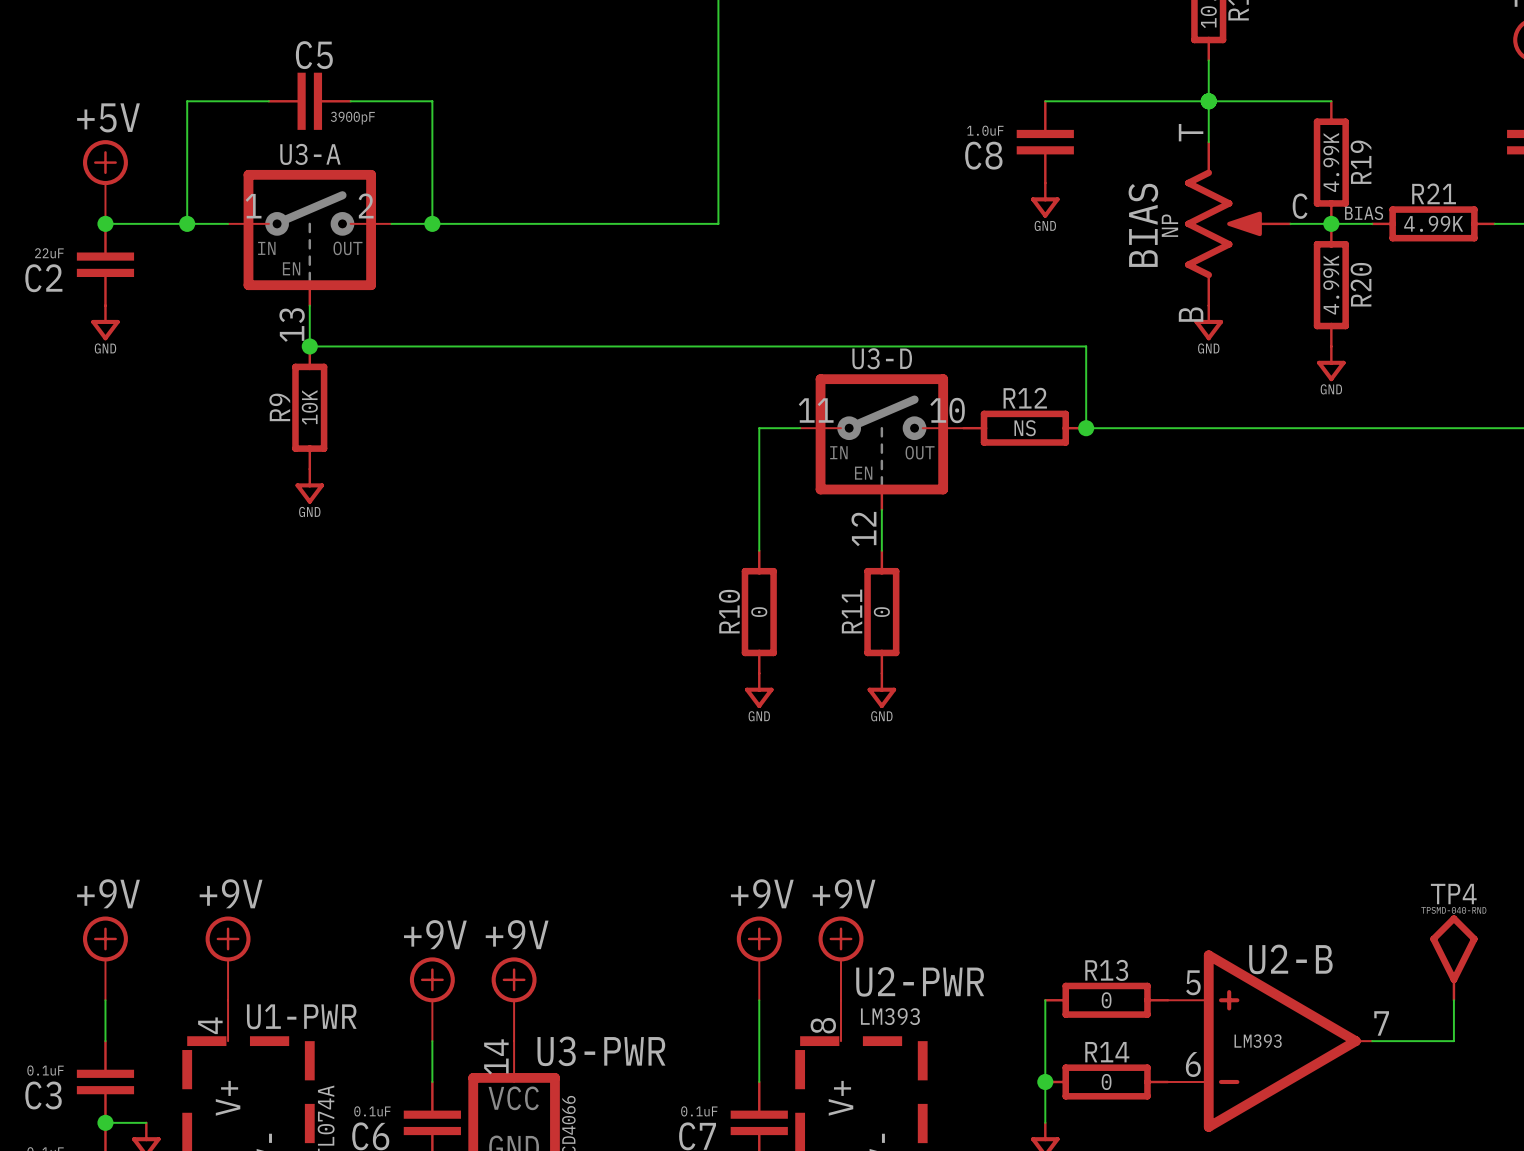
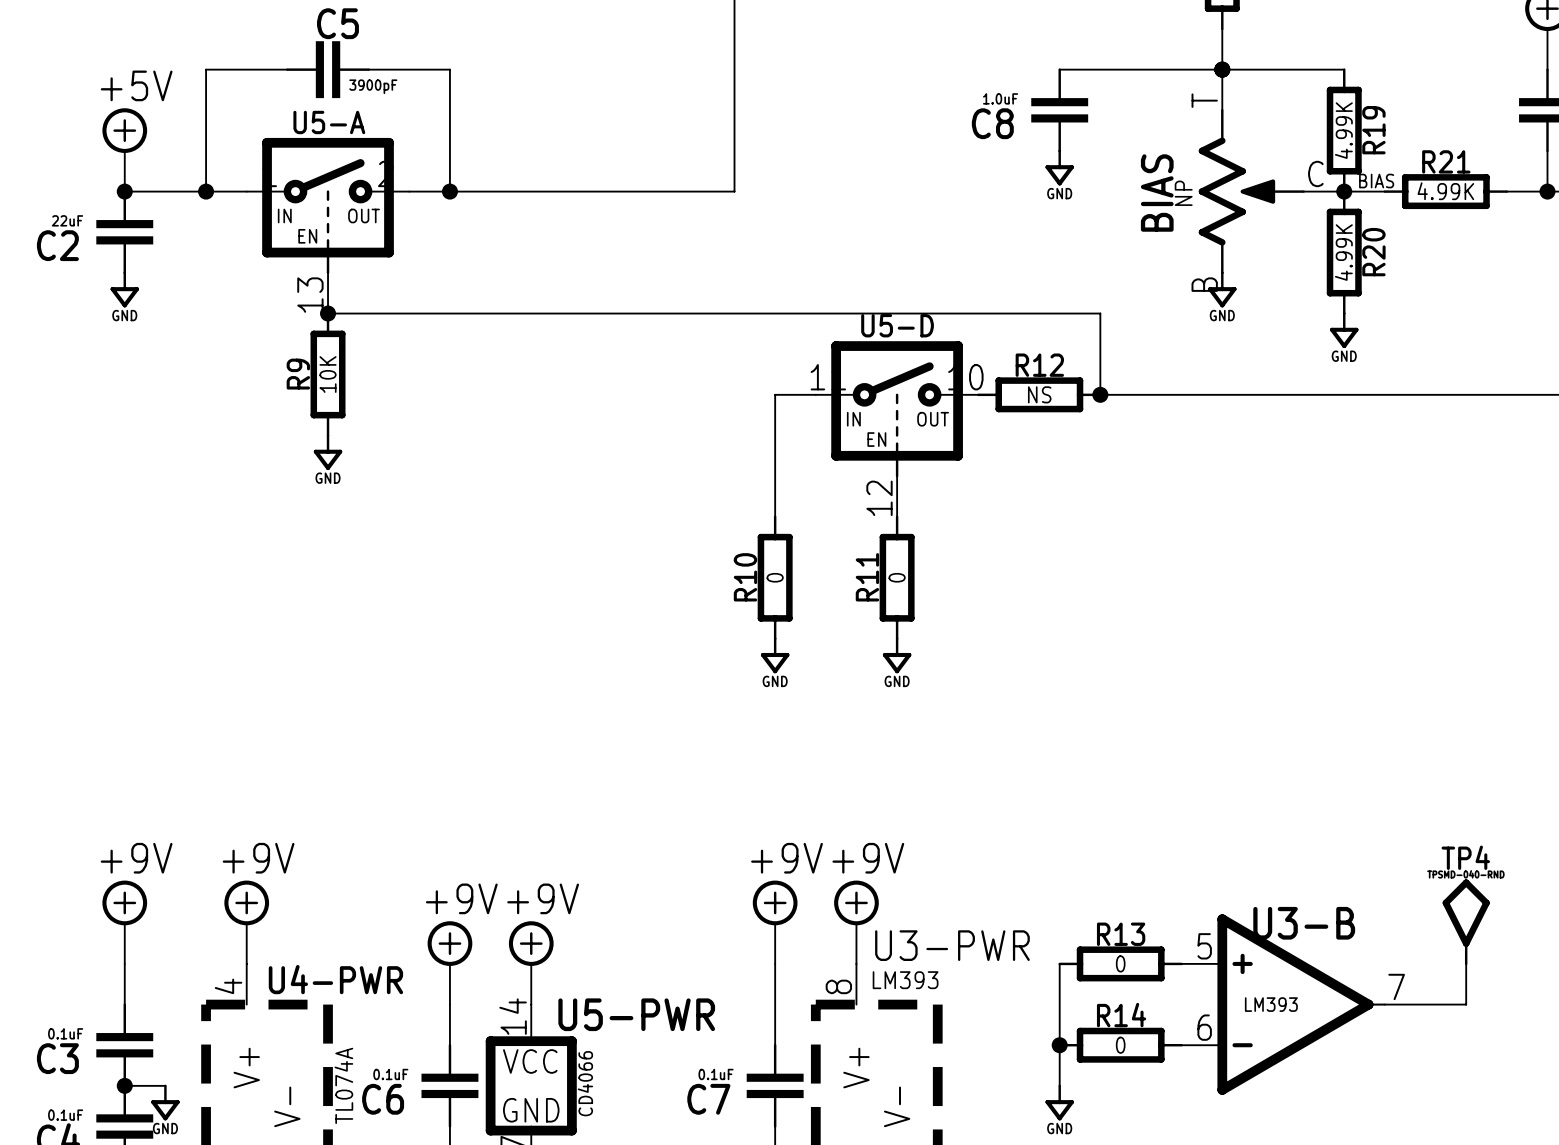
U3-A name: U3-A (310, 154) -> U5-A (329, 122)
U3-D name: U3-D (882, 358) -> U5-D (897, 325)
U2-B name: U2-B (1290, 959) -> U3-B (1304, 923)
U2-PWR name: U2-PWR (920, 981) -> U3-PWR (952, 945)
U1-PWR name: U1-PWR (301, 1016) -> U4-PWR (335, 979)
U3-PWR name: U3-PWR (601, 1051) -> U5-PWR (636, 1014)

